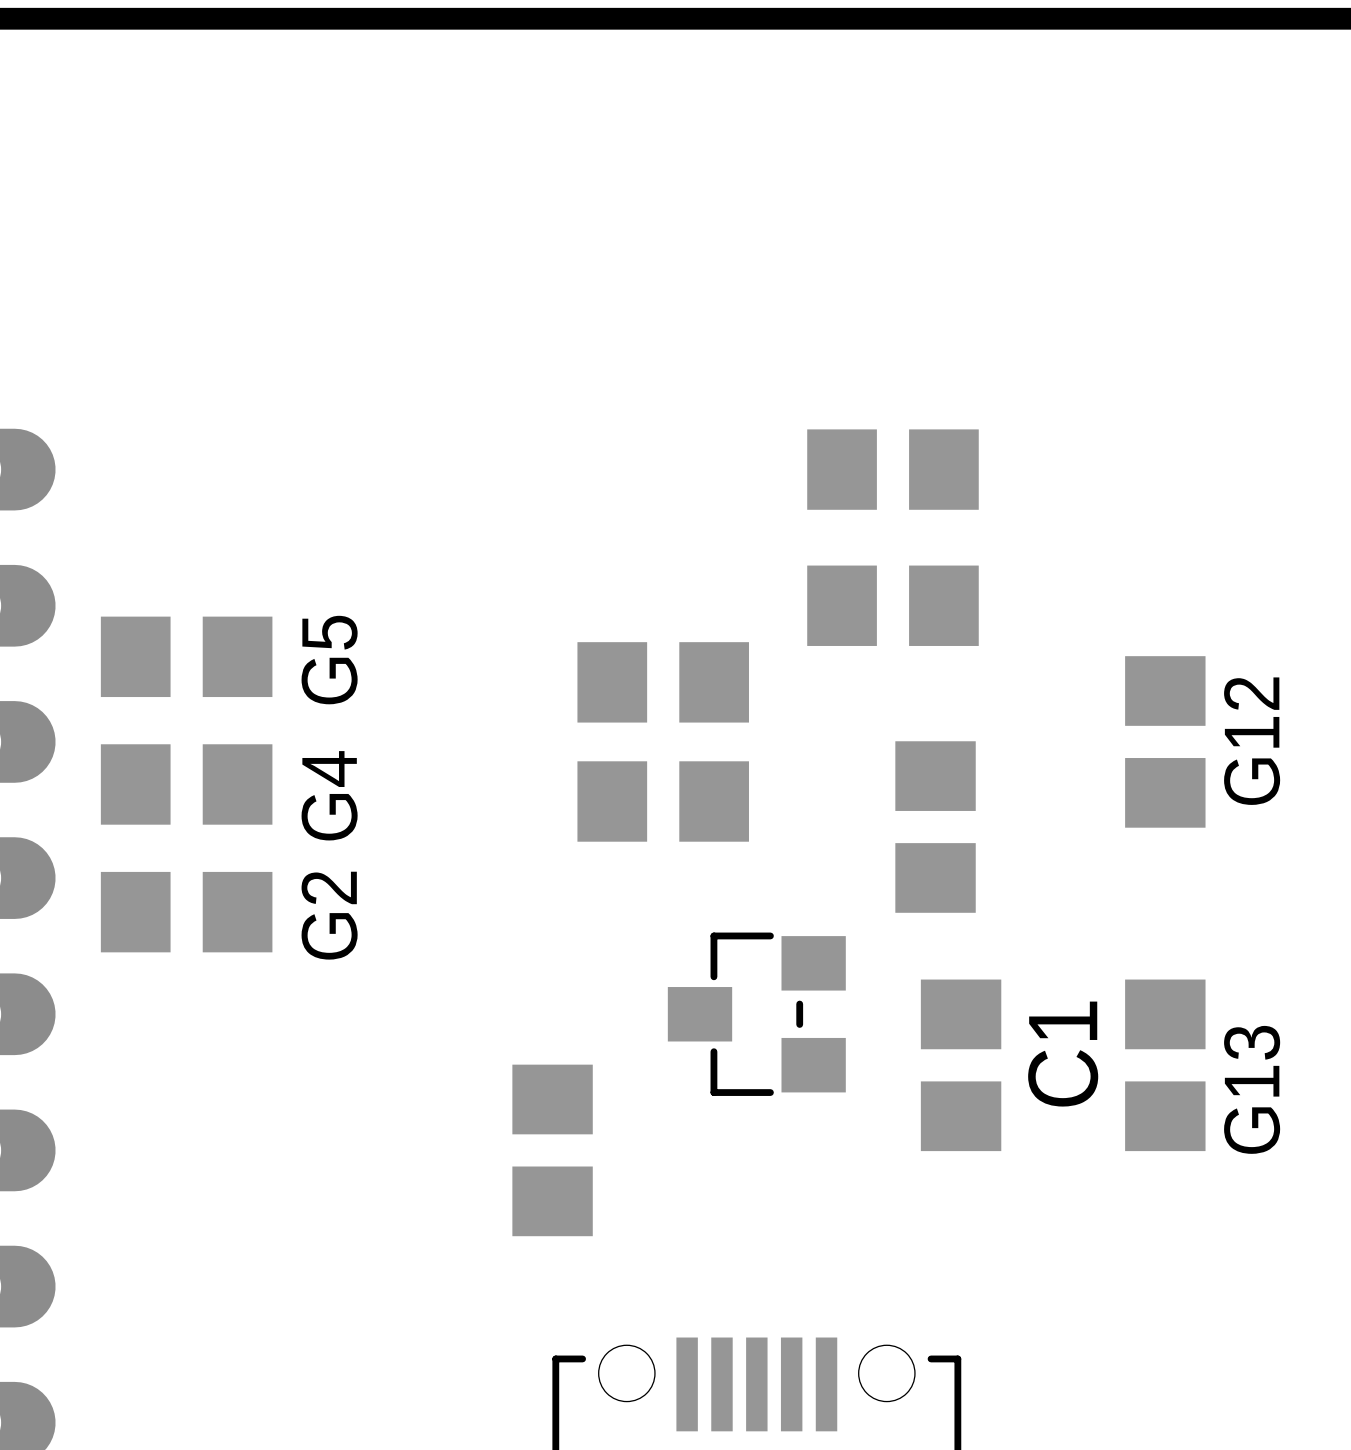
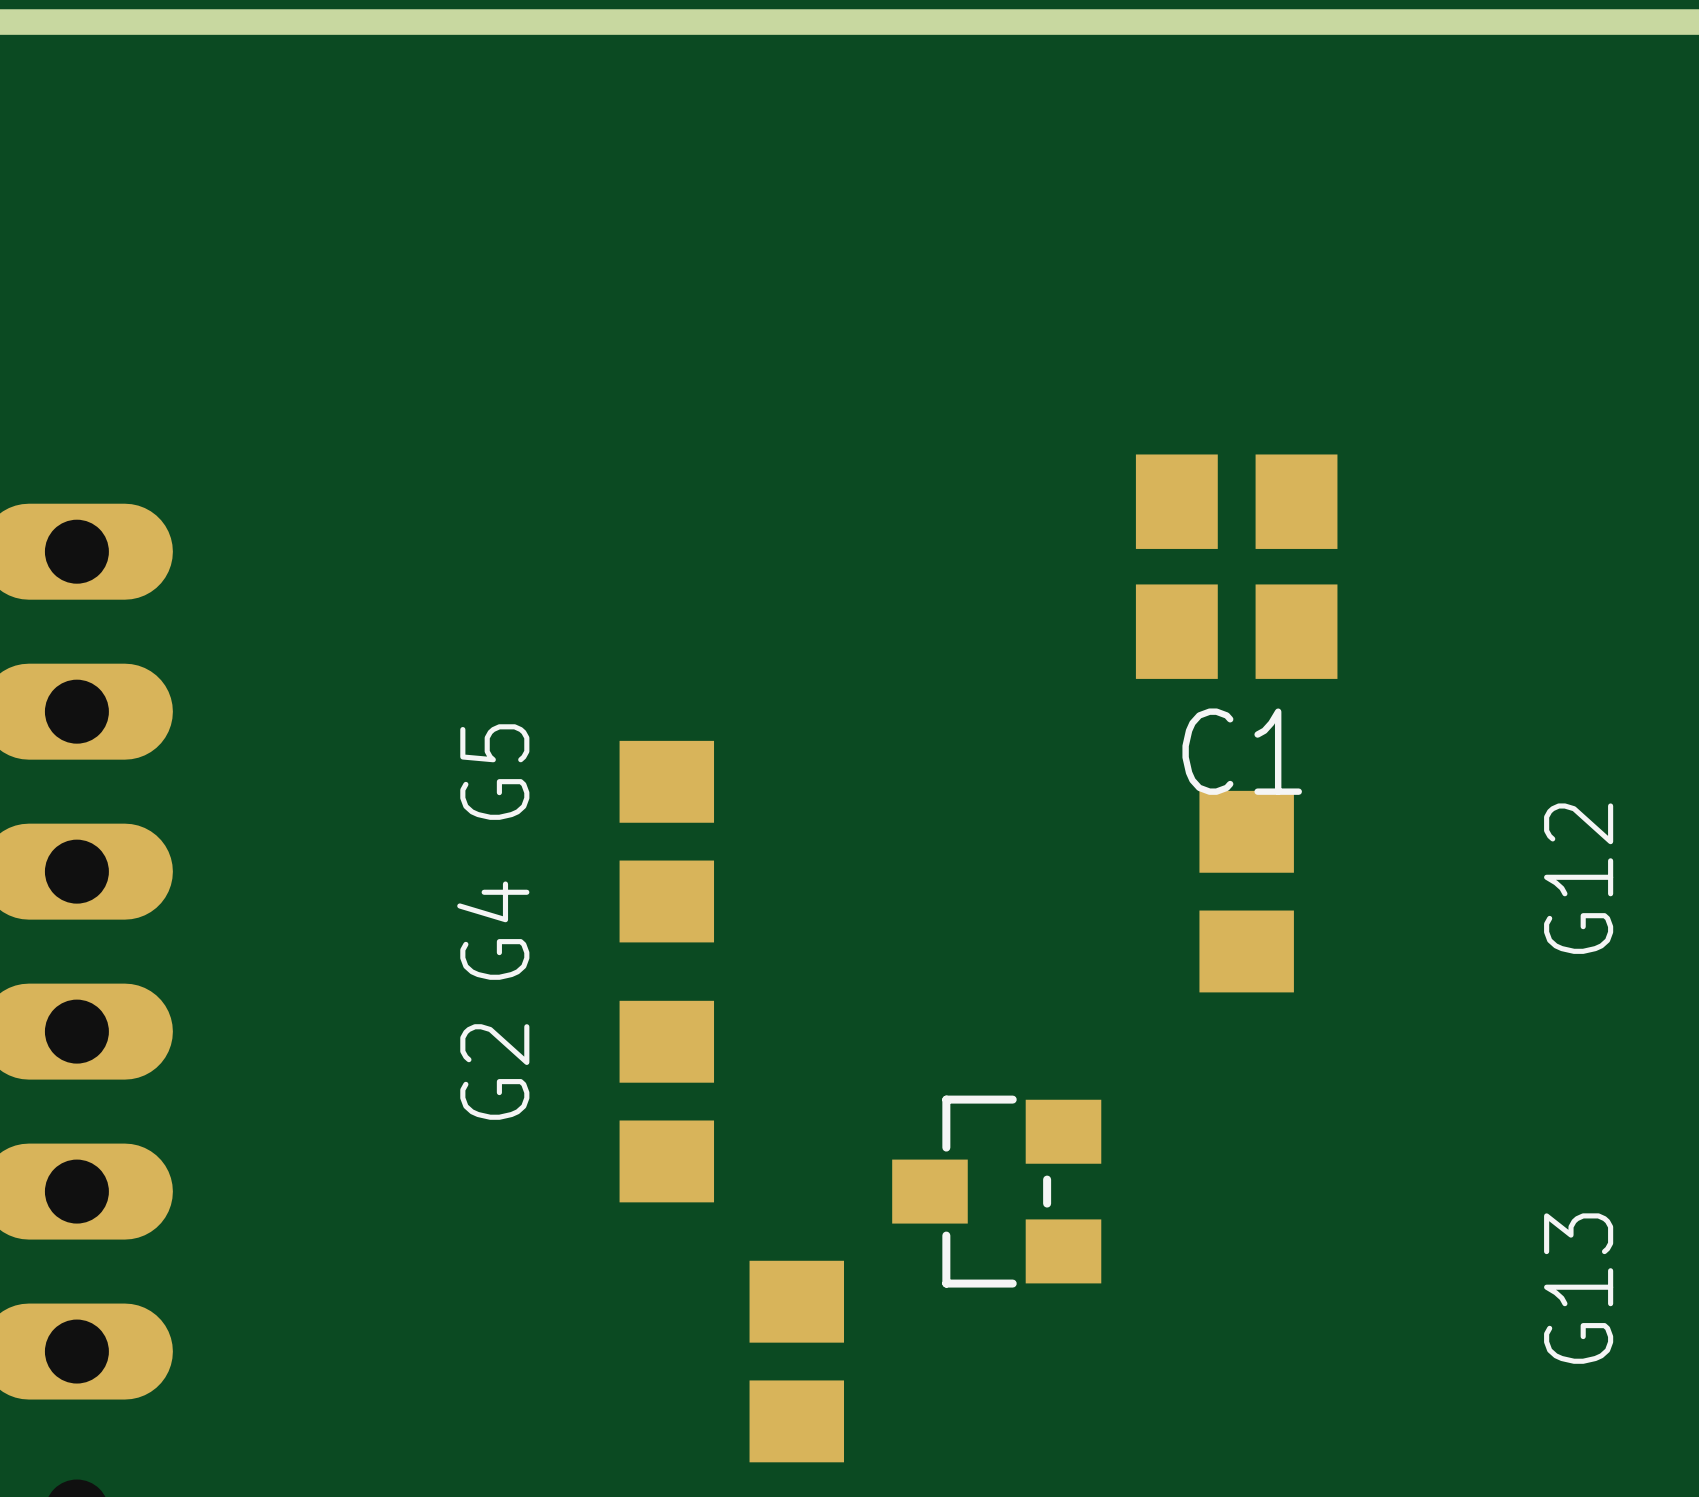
part position: (892, 469) -> (1236, 501)
part: (892, 605) -> none
part: (186, 656) -> none
part: (663, 682) -> none
part: none -> (666, 841)
part: (1165, 741) -> none
part: (186, 784) -> none
part: (663, 801) -> none
part position: (935, 827) -> (1246, 891)
part: (186, 912) -> none
part: none -> (666, 1101)
C1 rotation: 0° (961, 1065) -> 90° clockwise (1236, 631)
C1 position: (961, 1065) -> (1236, 631)
part: (1165, 1065) -> none
part position: (552, 1150) -> (796, 1361)

